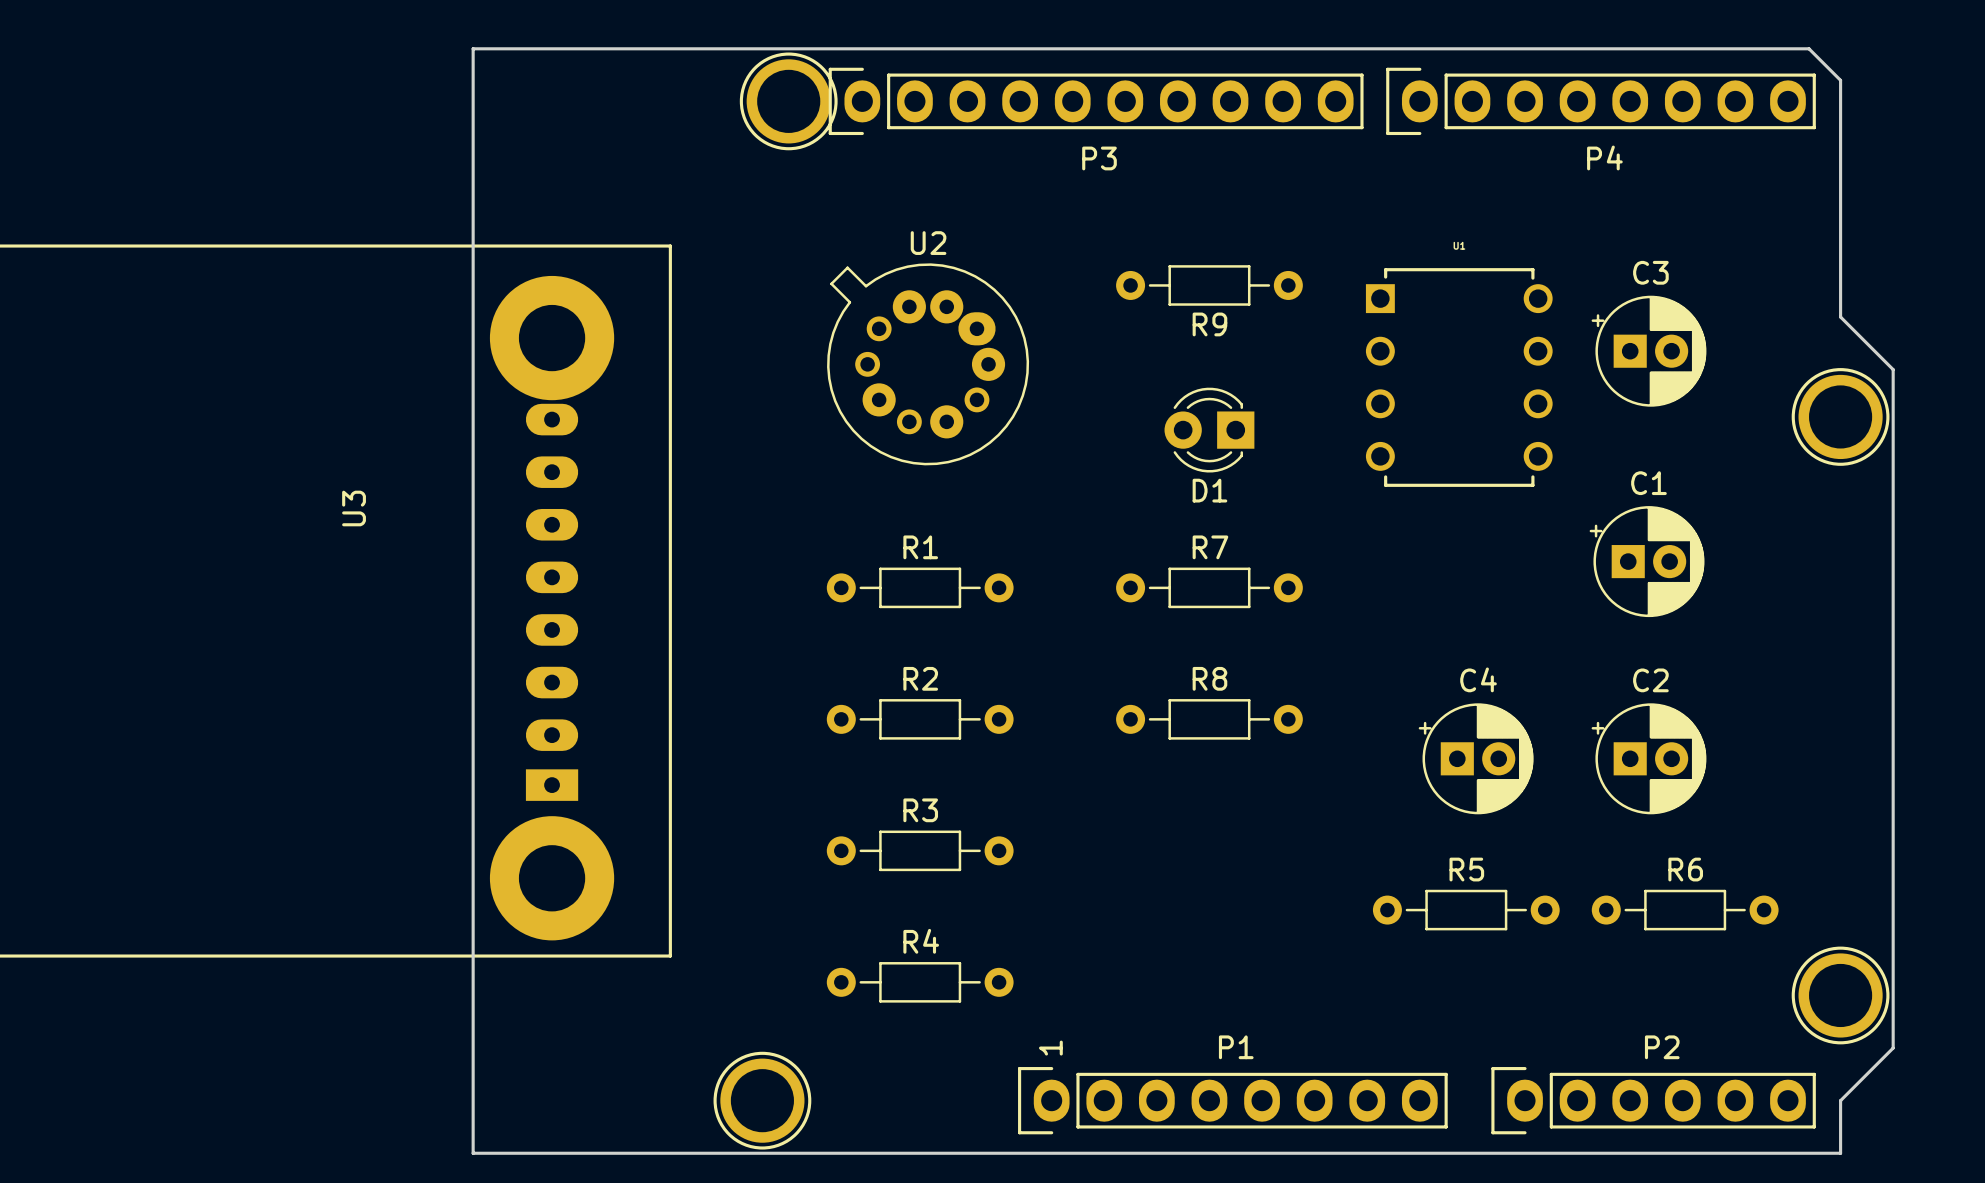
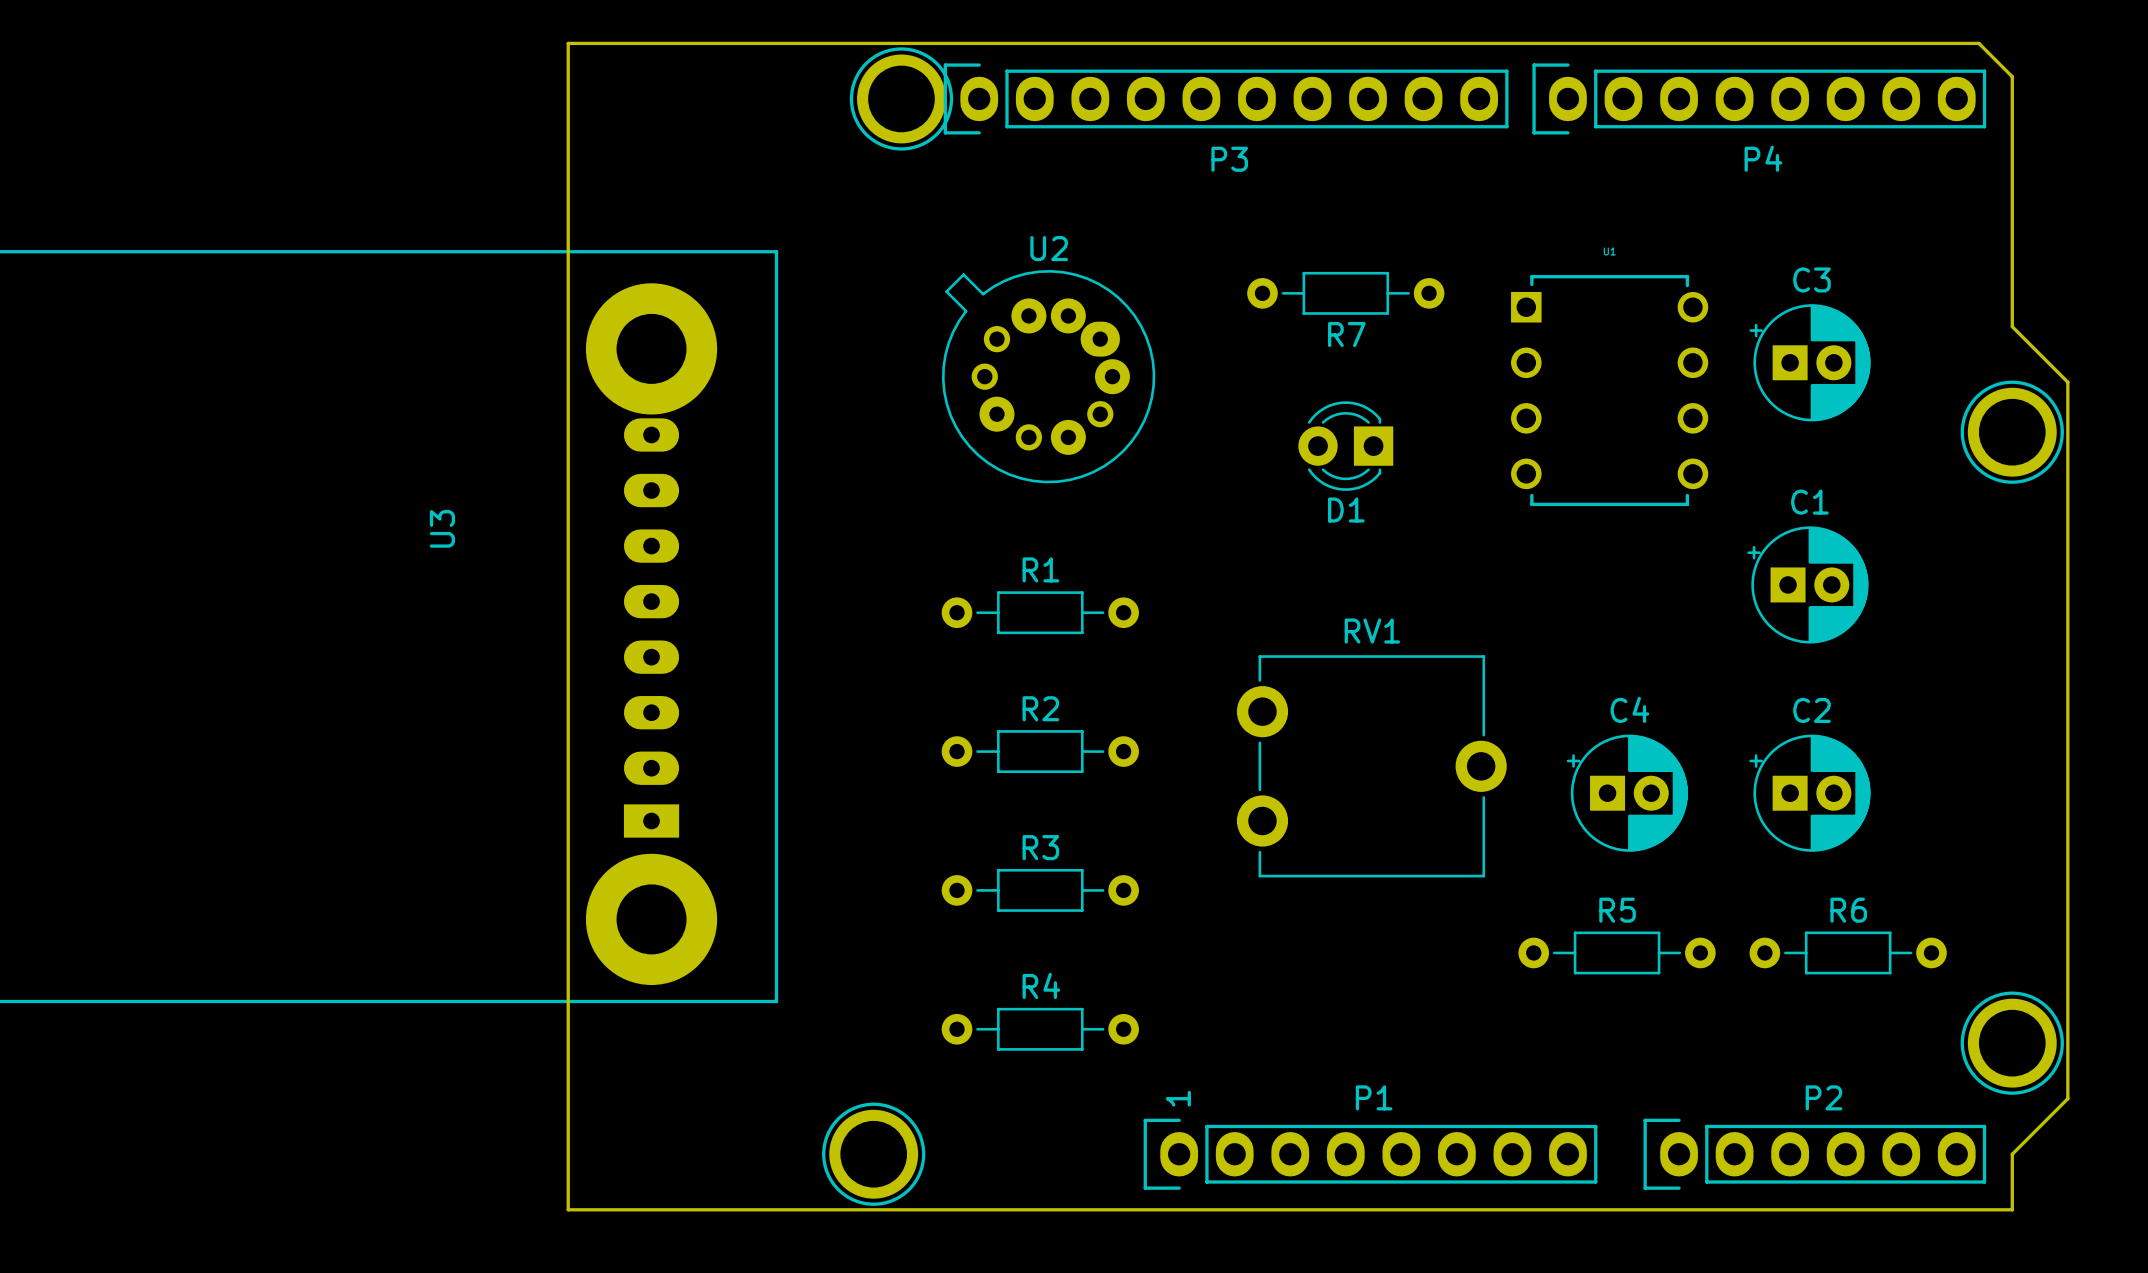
R9 name: R9 (1209, 324) -> R7 (1346, 334)
R7: (1209, 587) -> none
R8: (1209, 719) -> none
RV1: none -> (1371, 766)

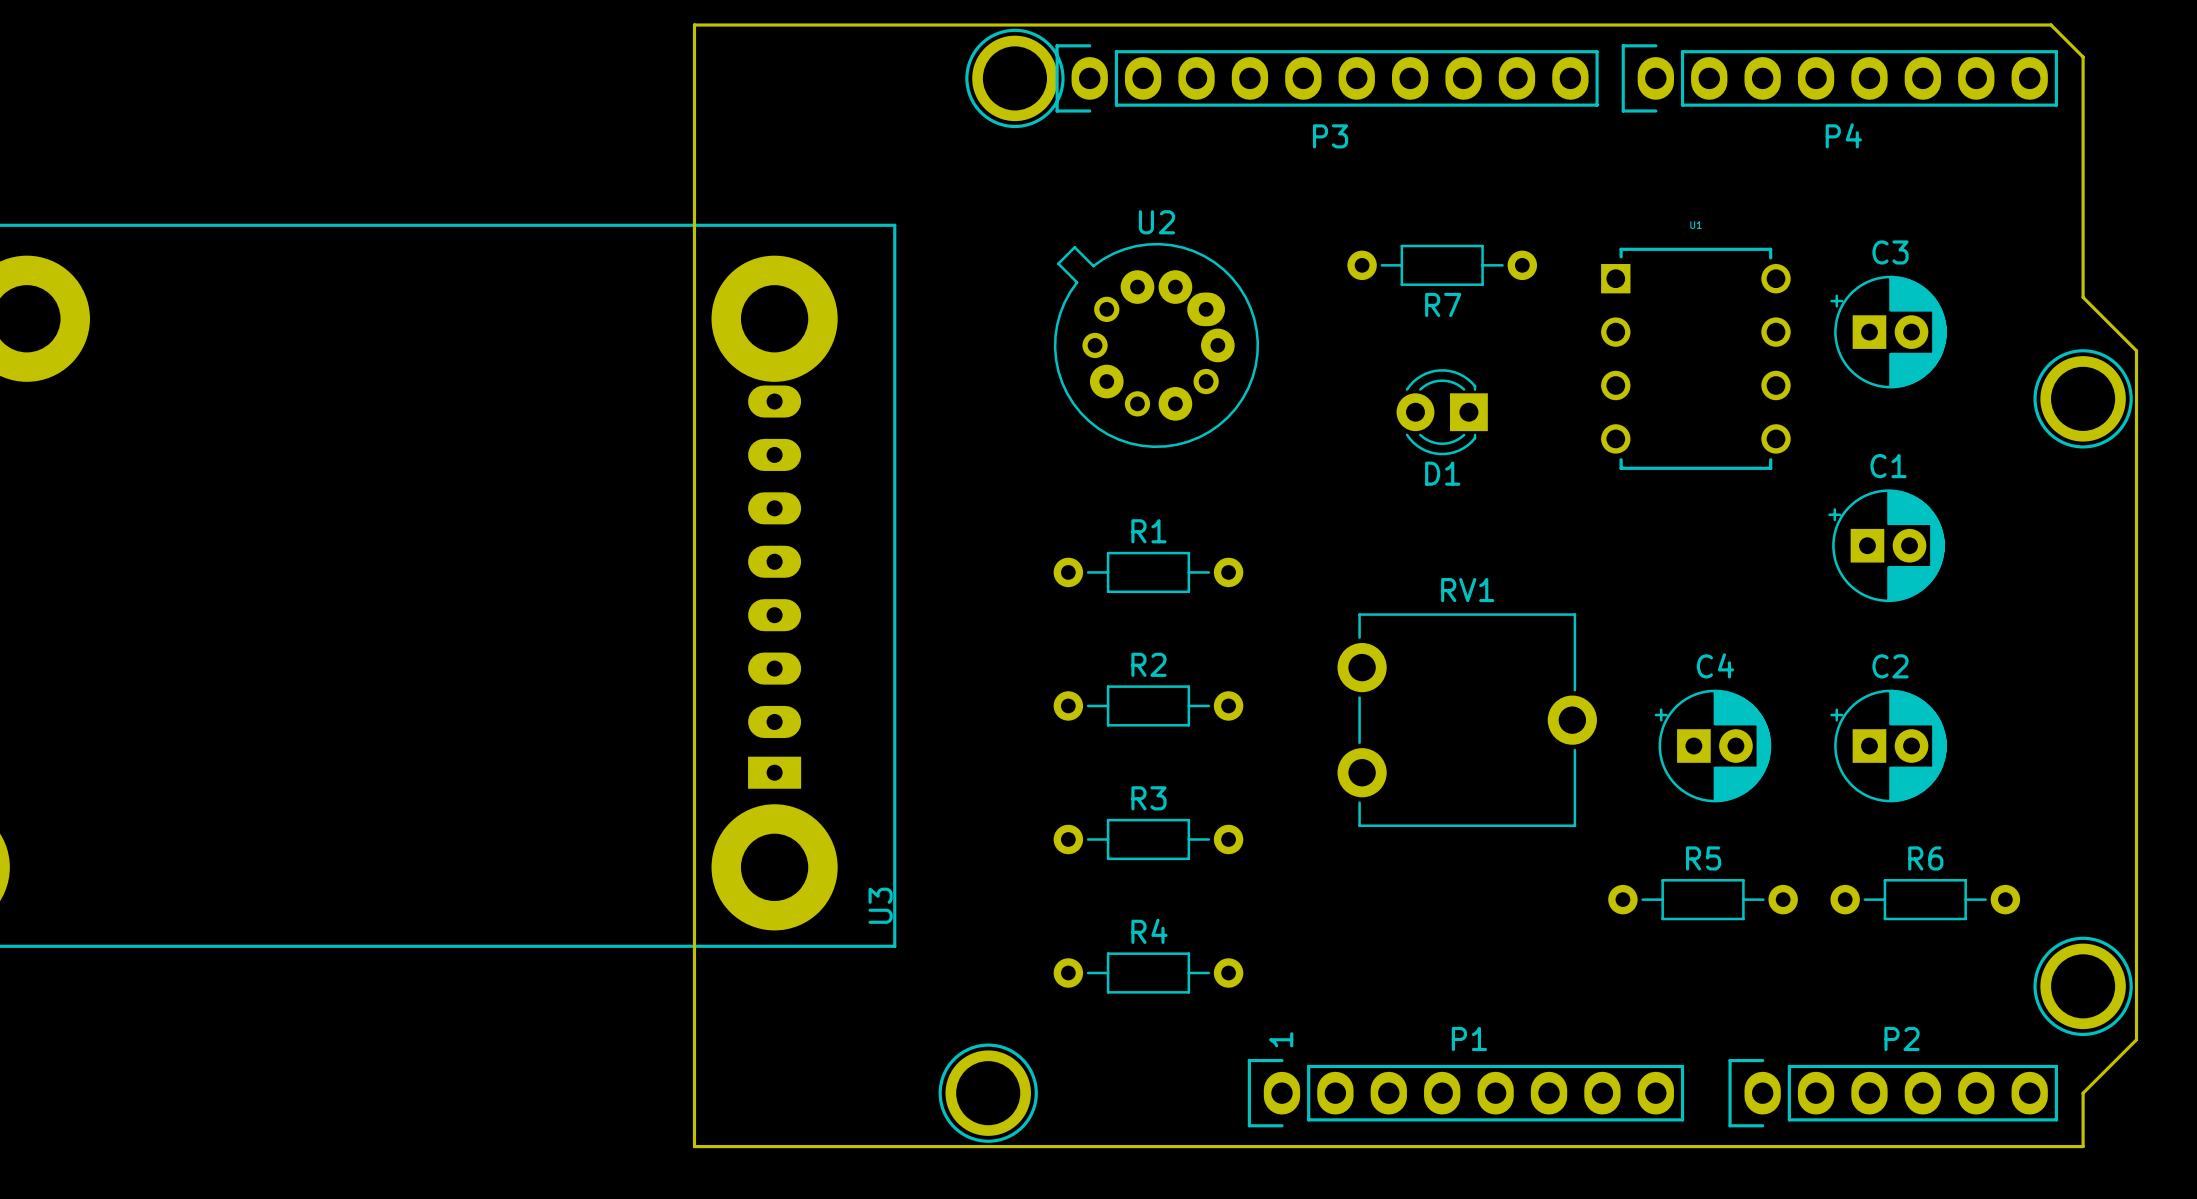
U3 name position: U3 (442, 528) -> U3 (880, 905)

